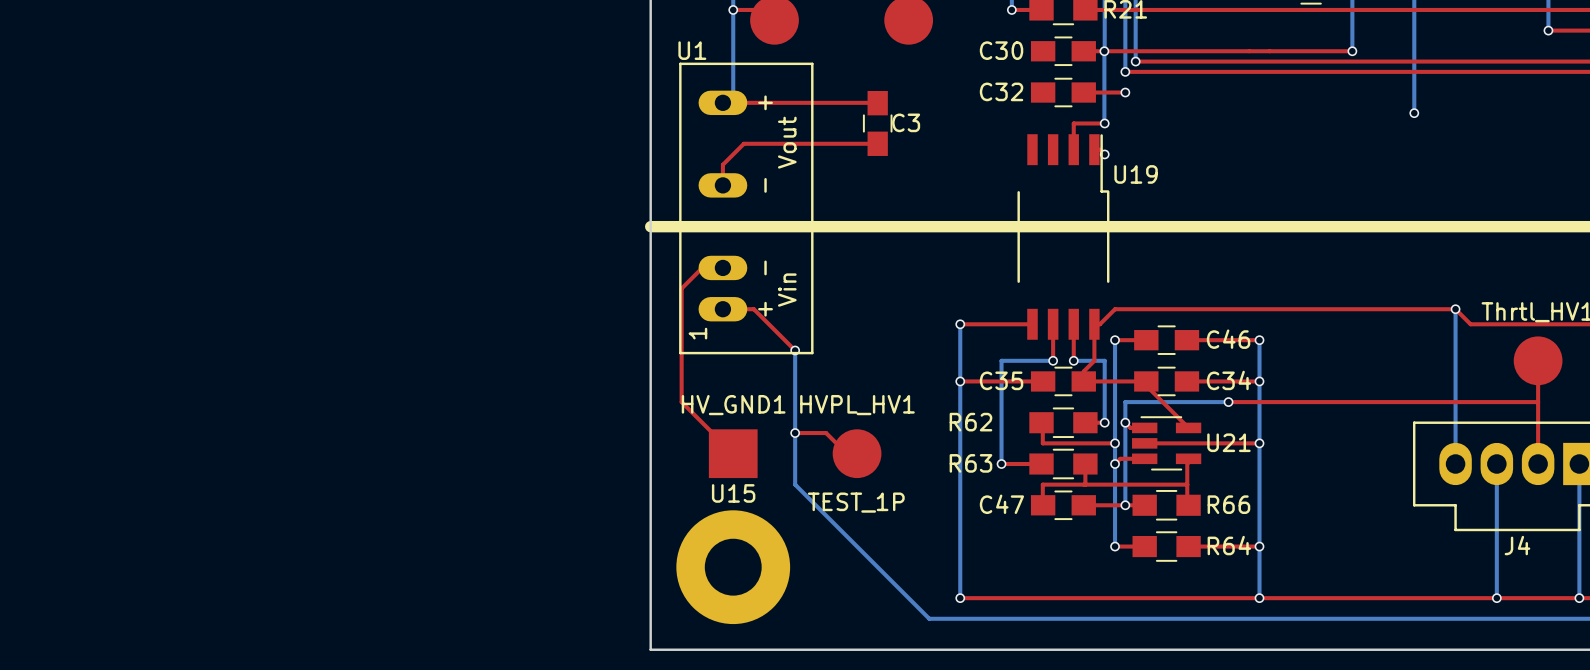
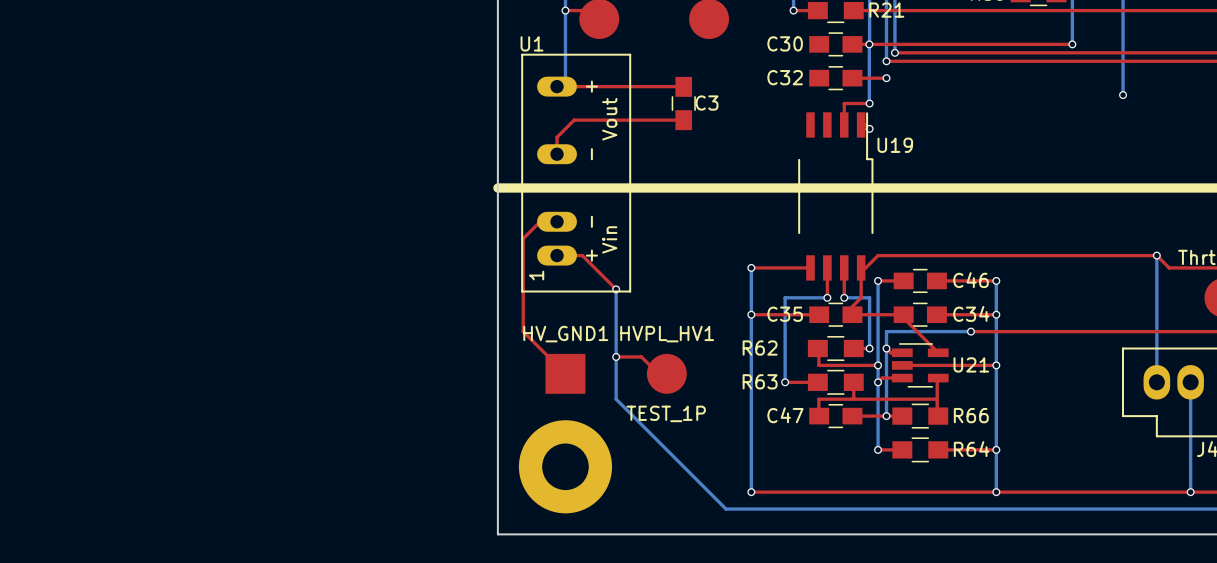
U15 name: U15 (733, 493) -> none

